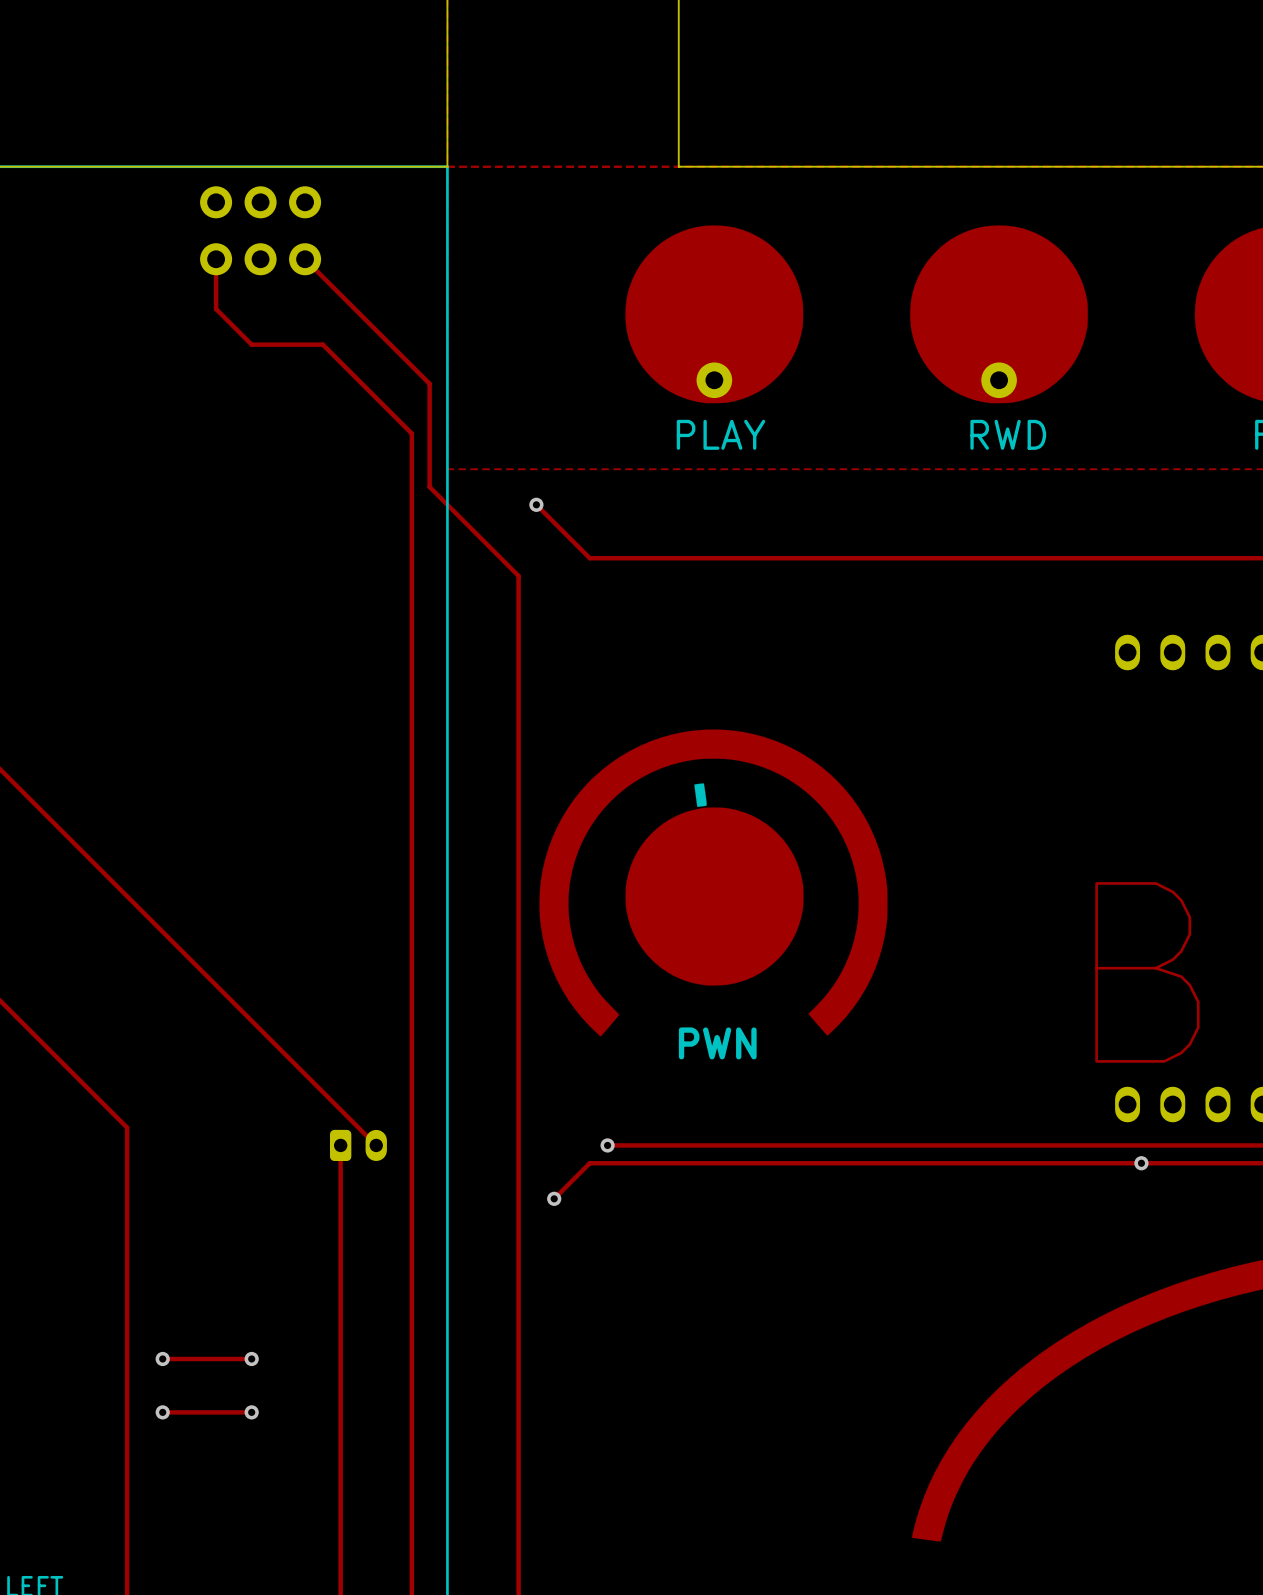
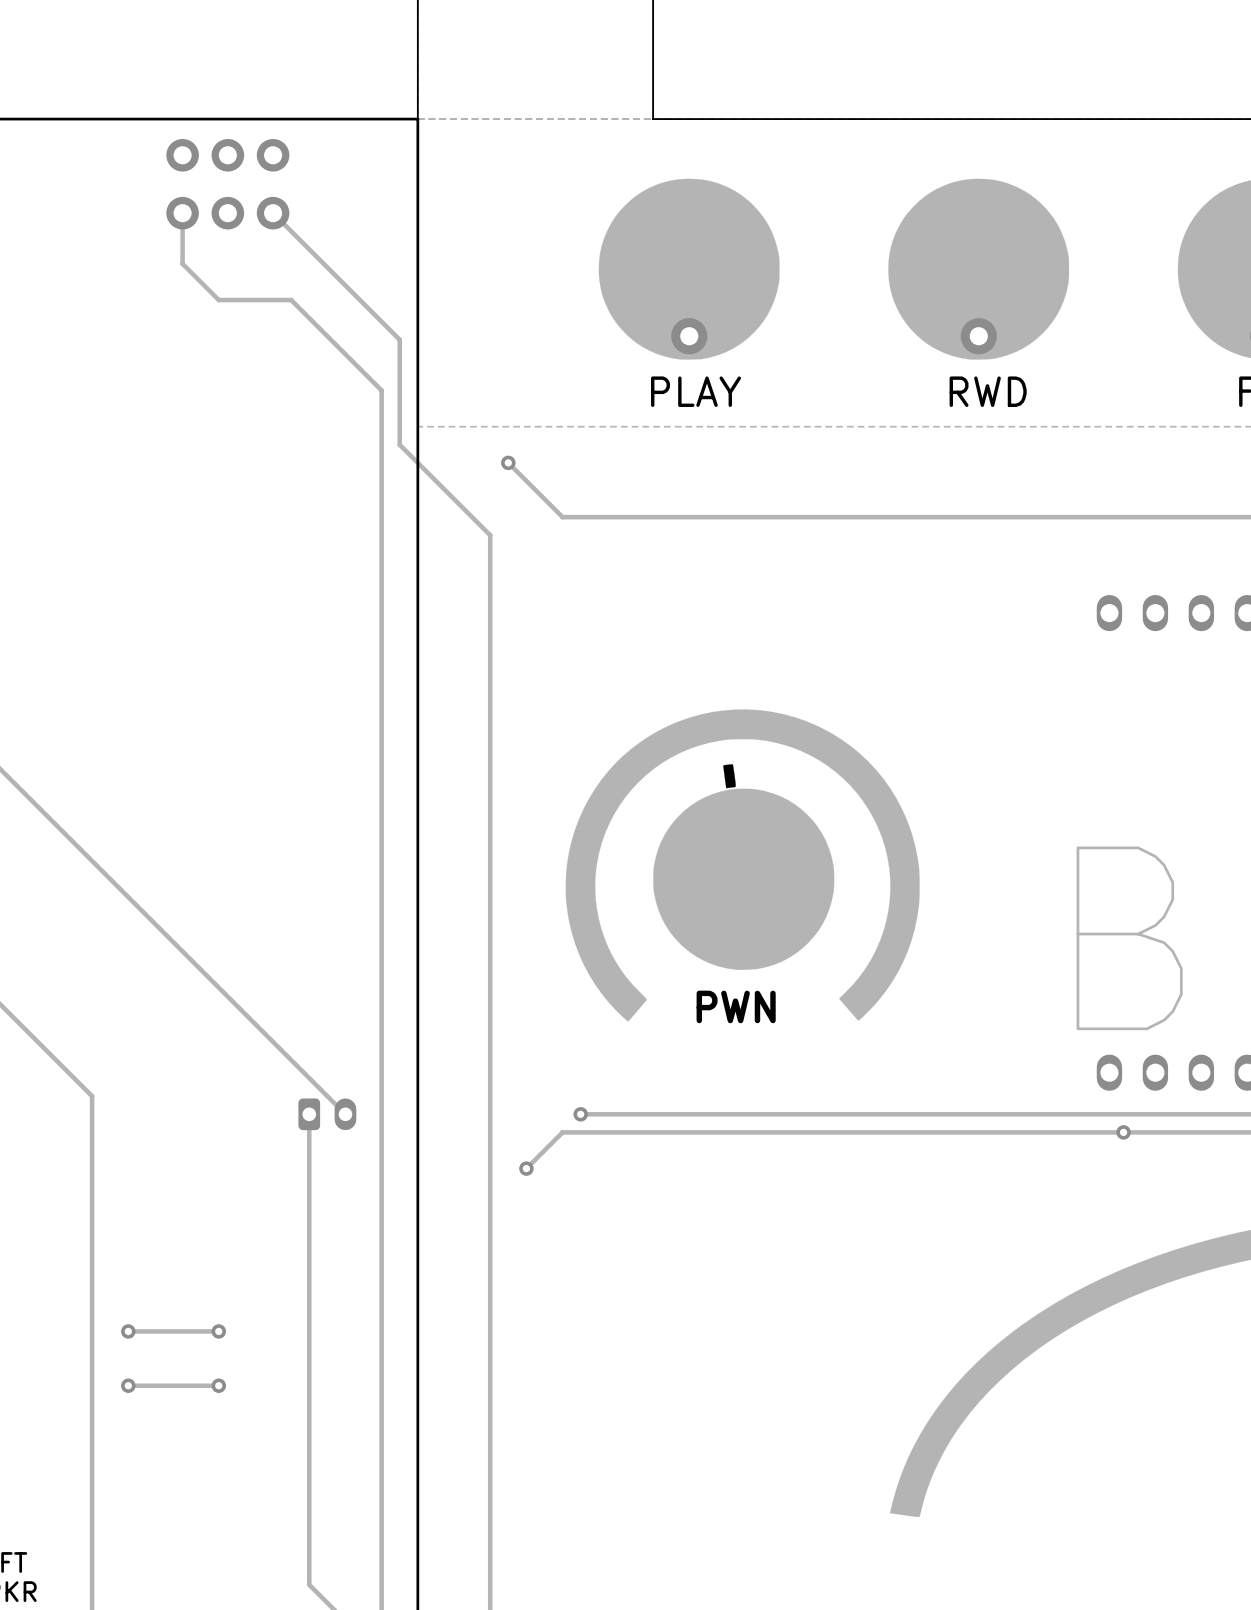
drawing position: (713, 882) -> (742, 865)
text position: PWN (717, 1043) -> PWN (736, 1006)

